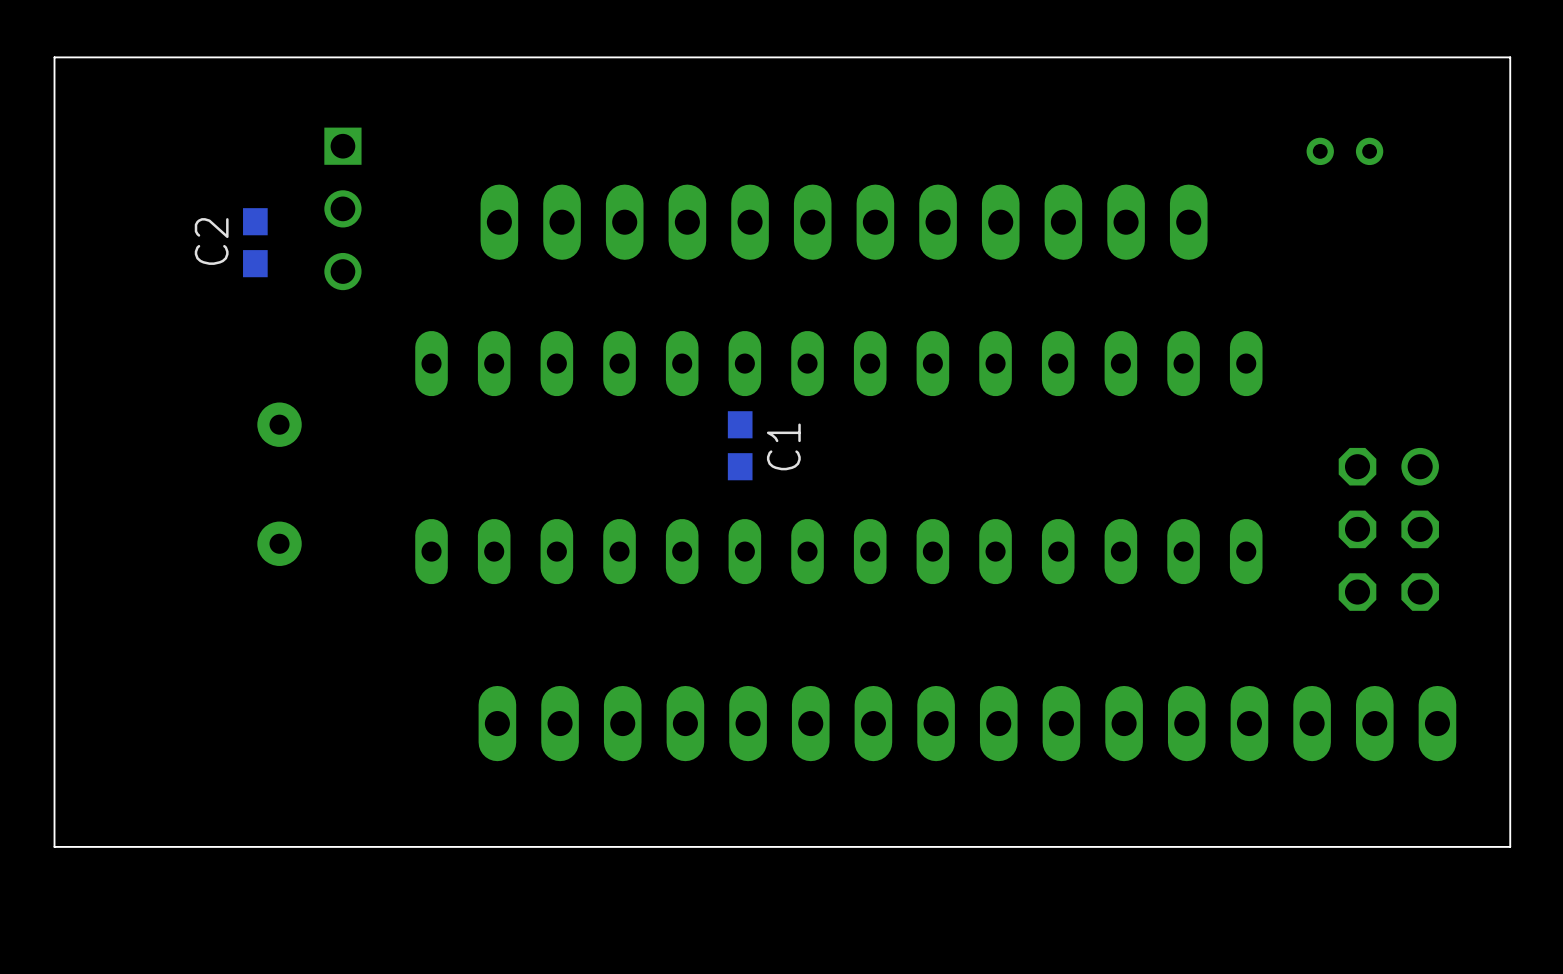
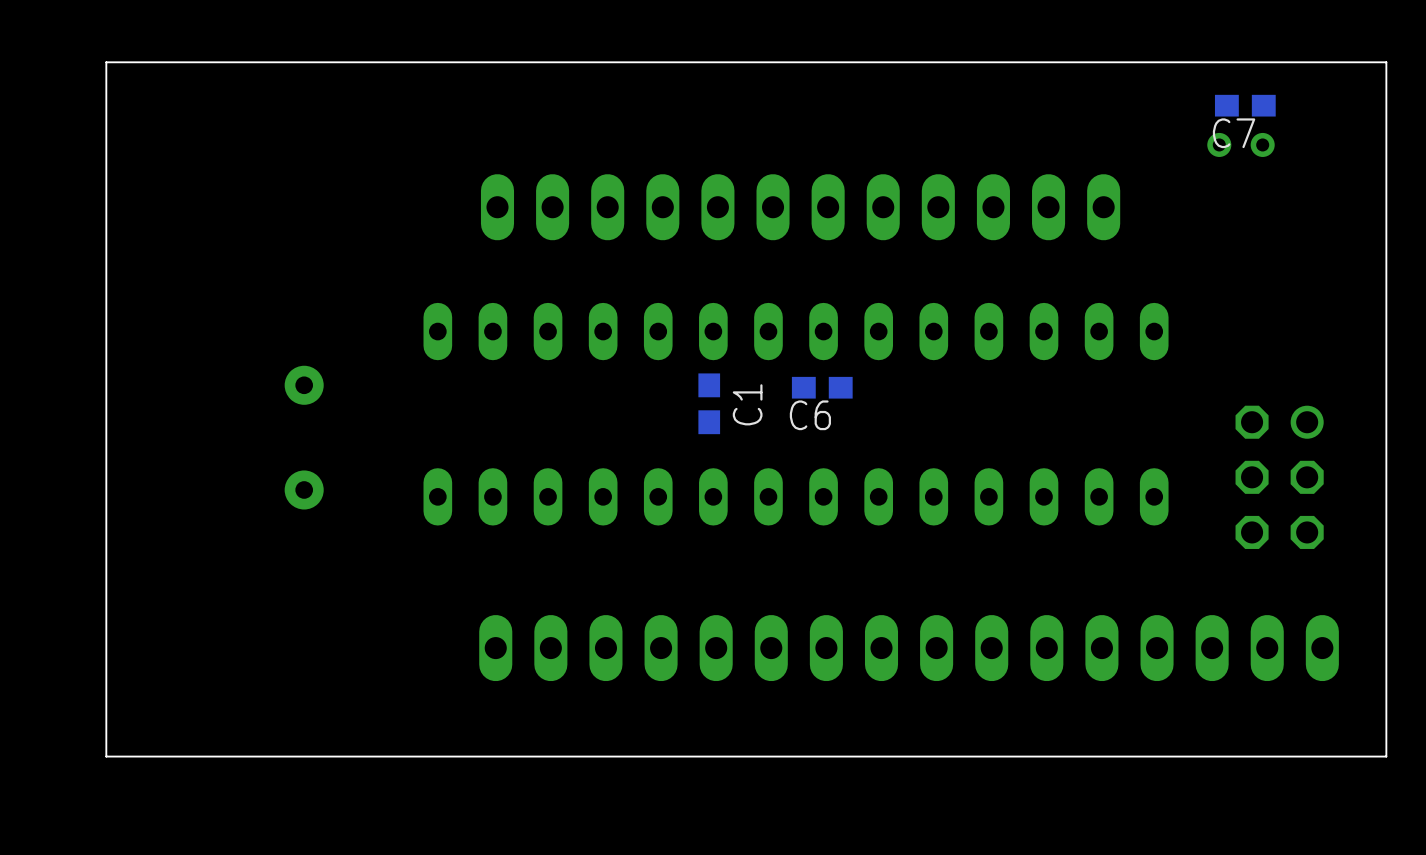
C7: none -> (1245, 105)
part: (342, 208) -> none
C2: (255, 242) -> none
C6: none -> (822, 387)

